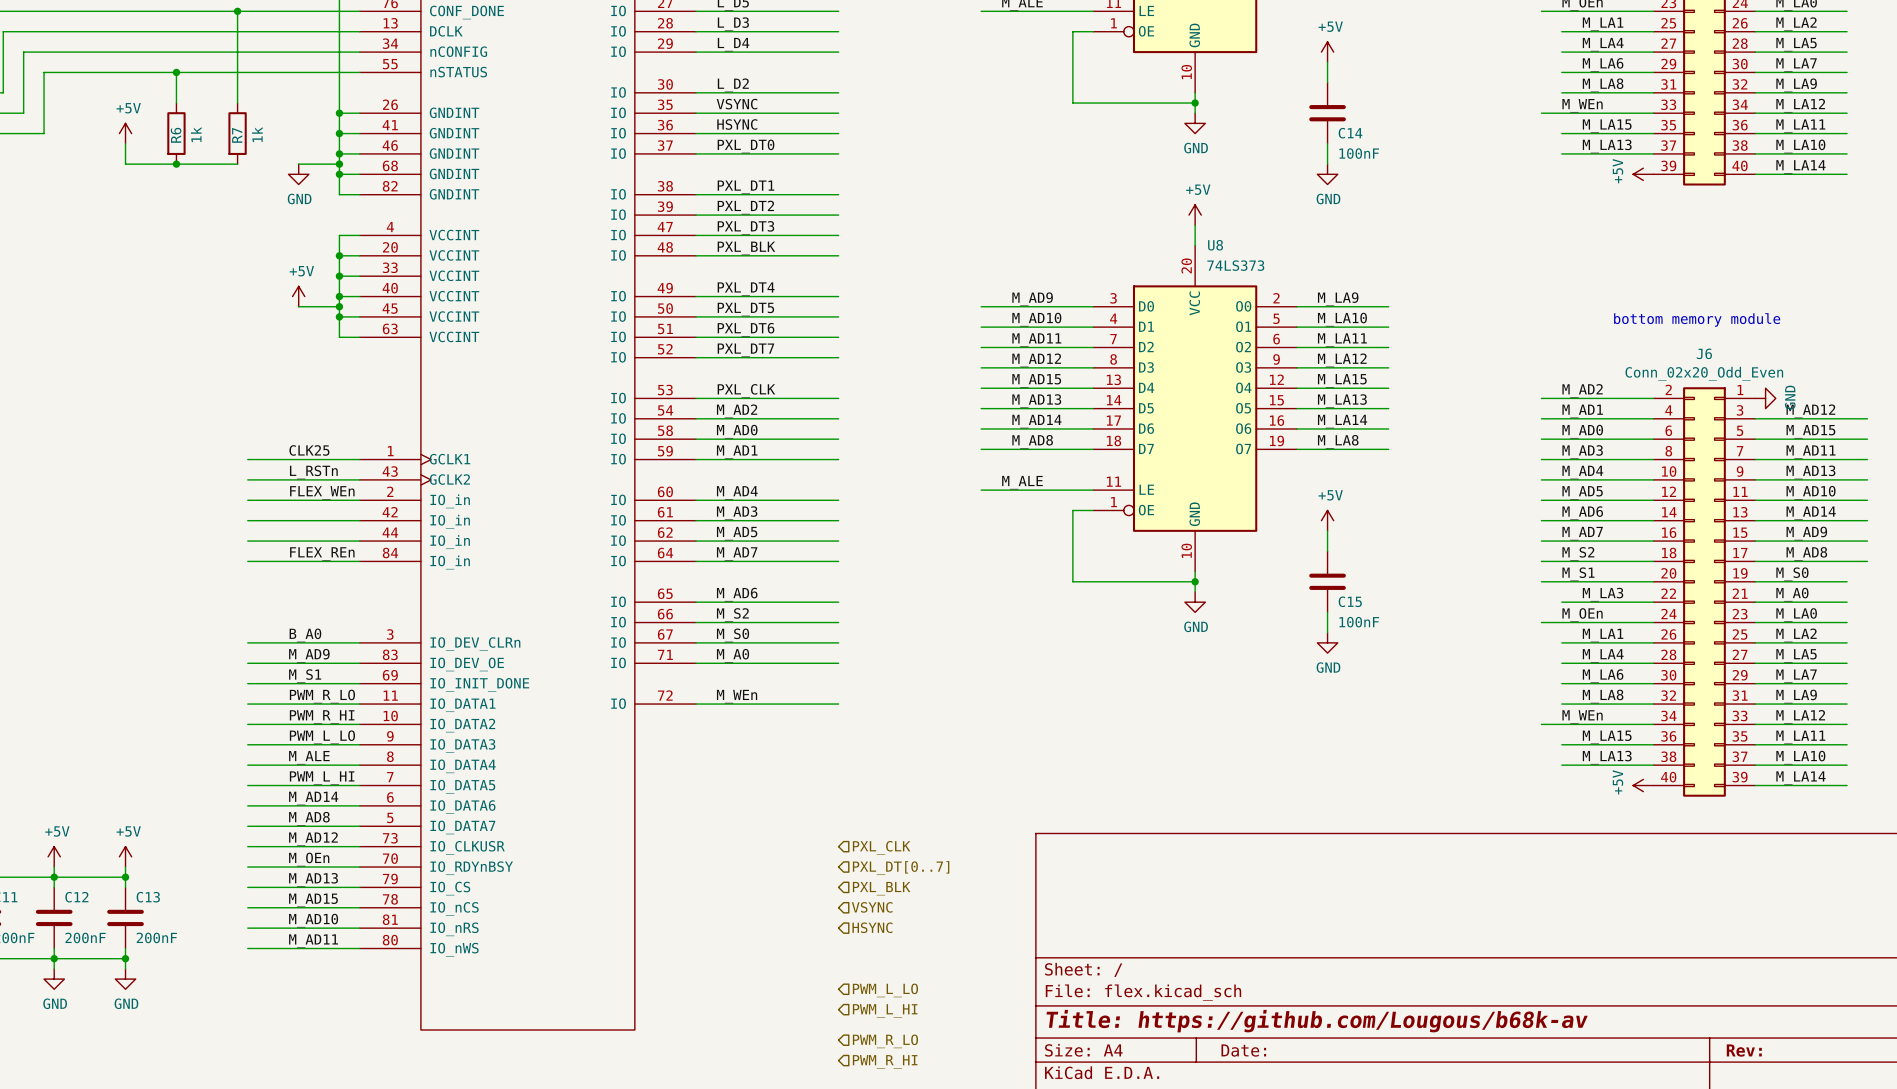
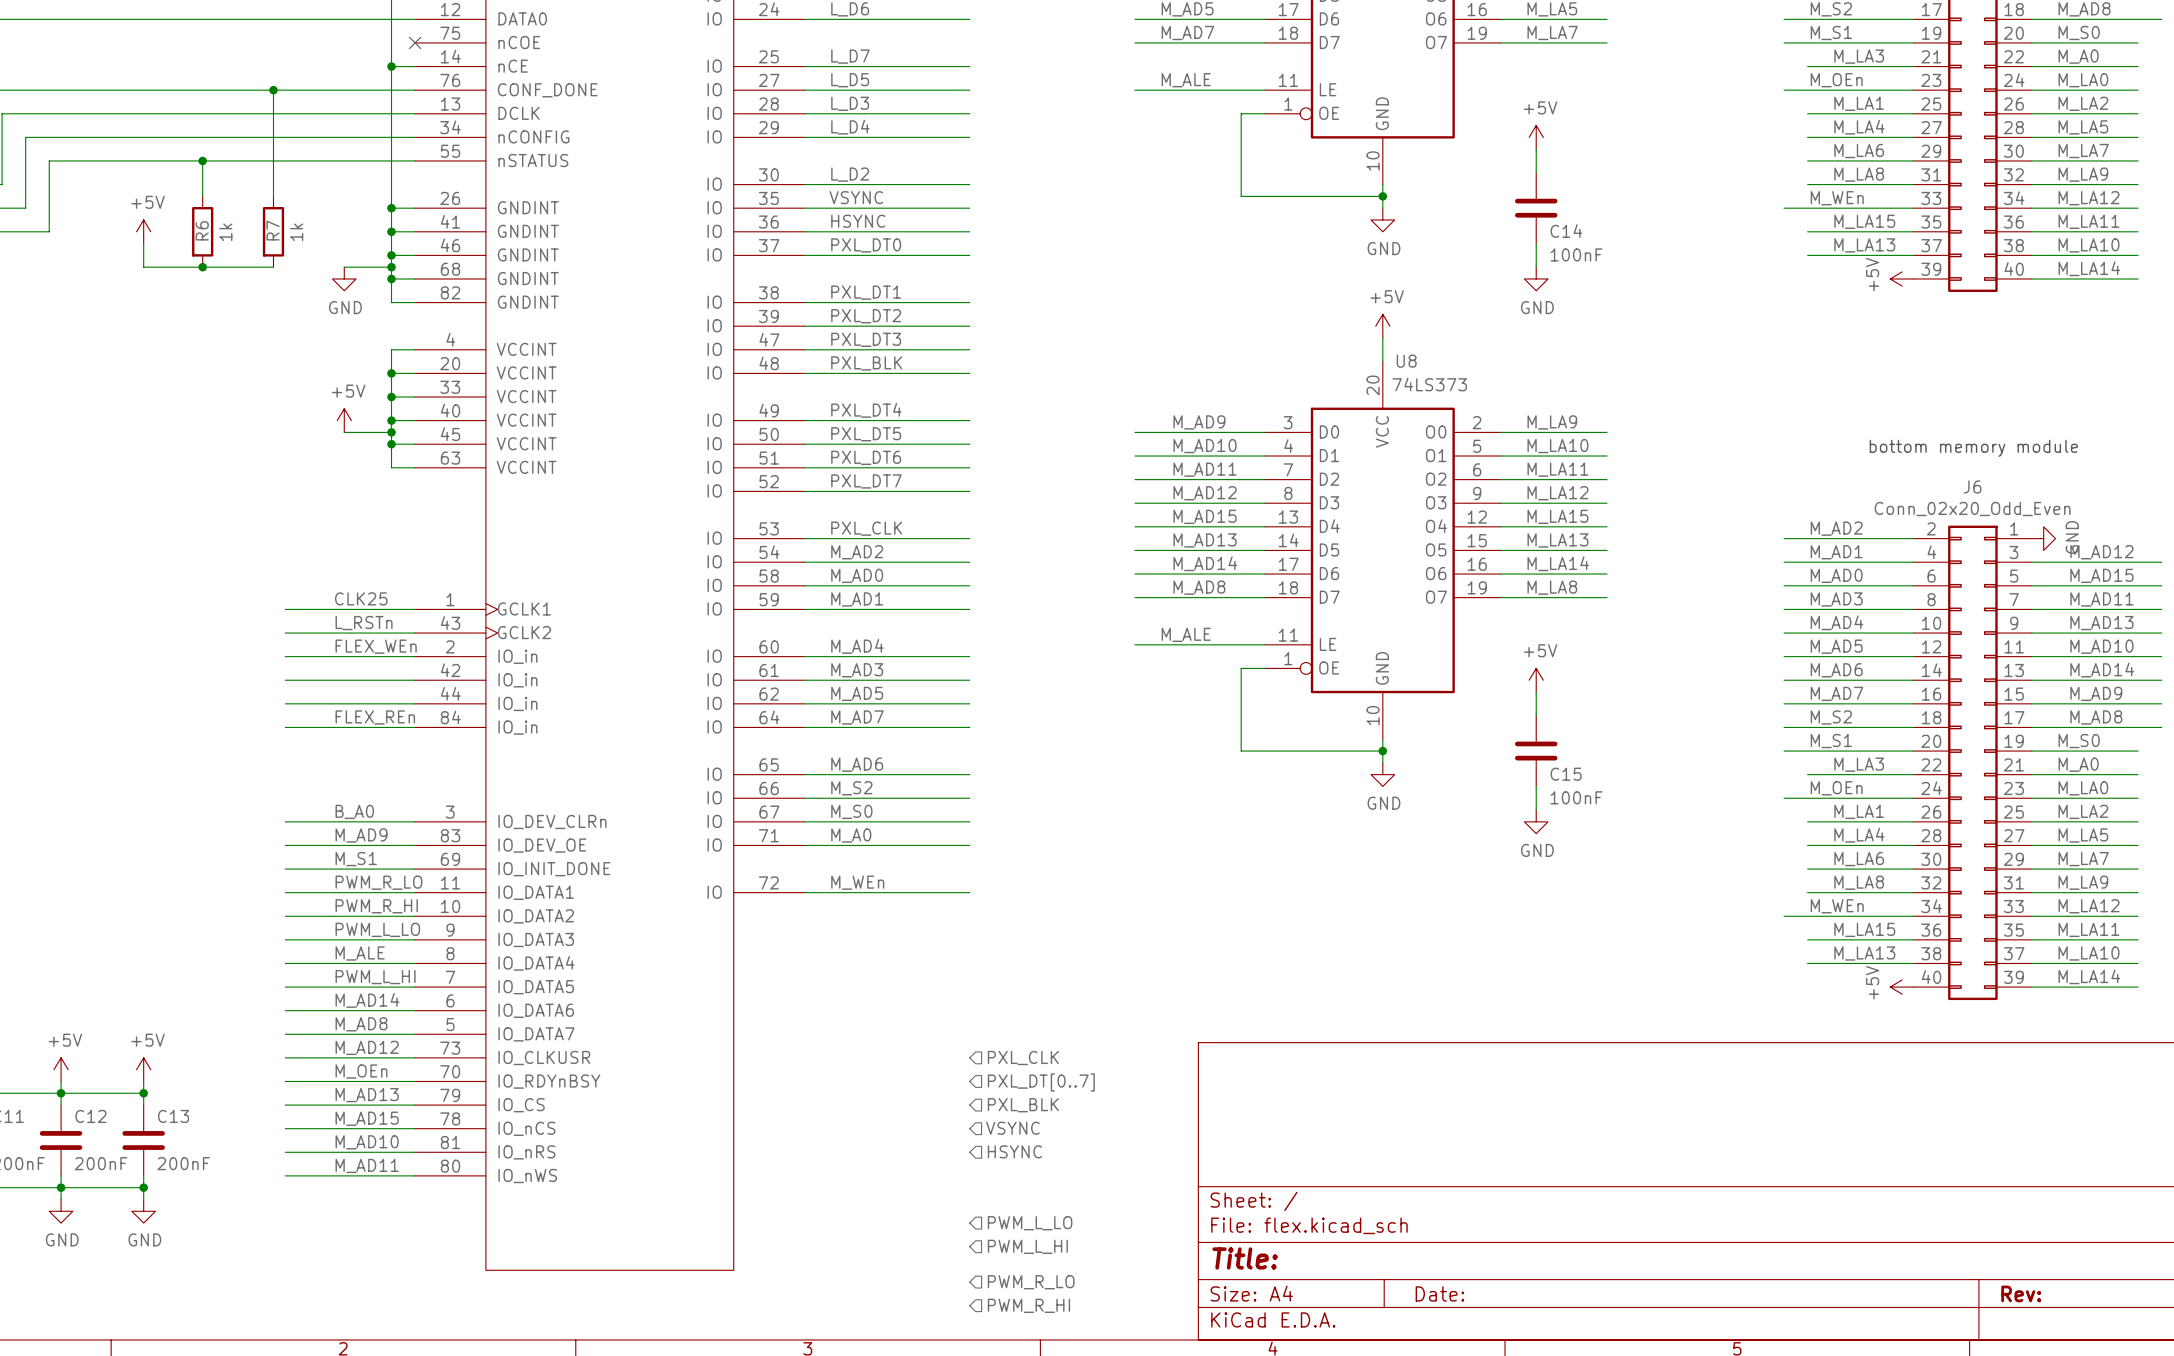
title block: Title: https://github.com/Lougous/b68k-av (1317, 1021) -> Title: (1245, 1258)

